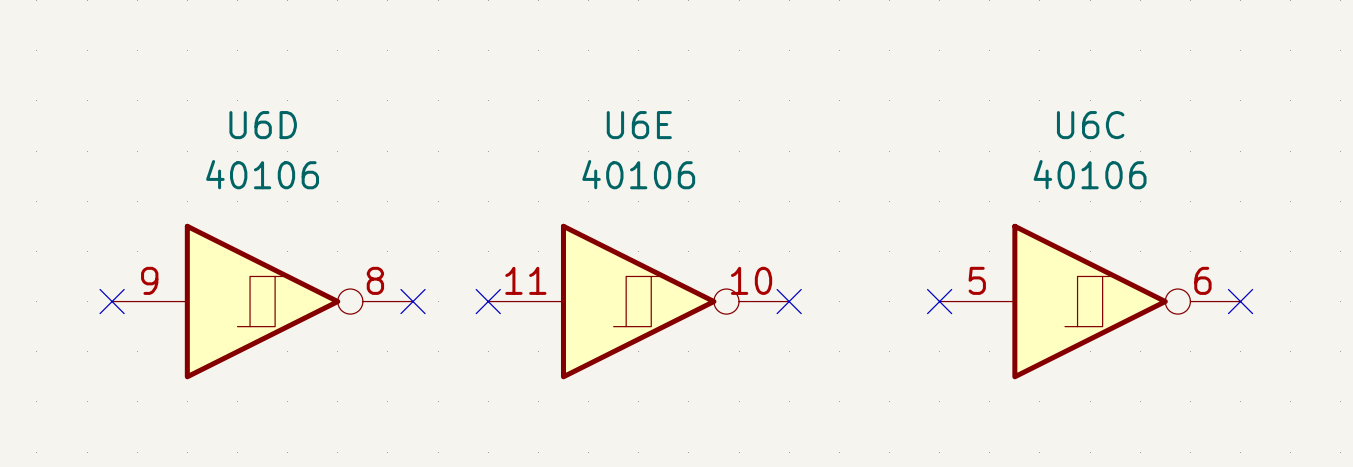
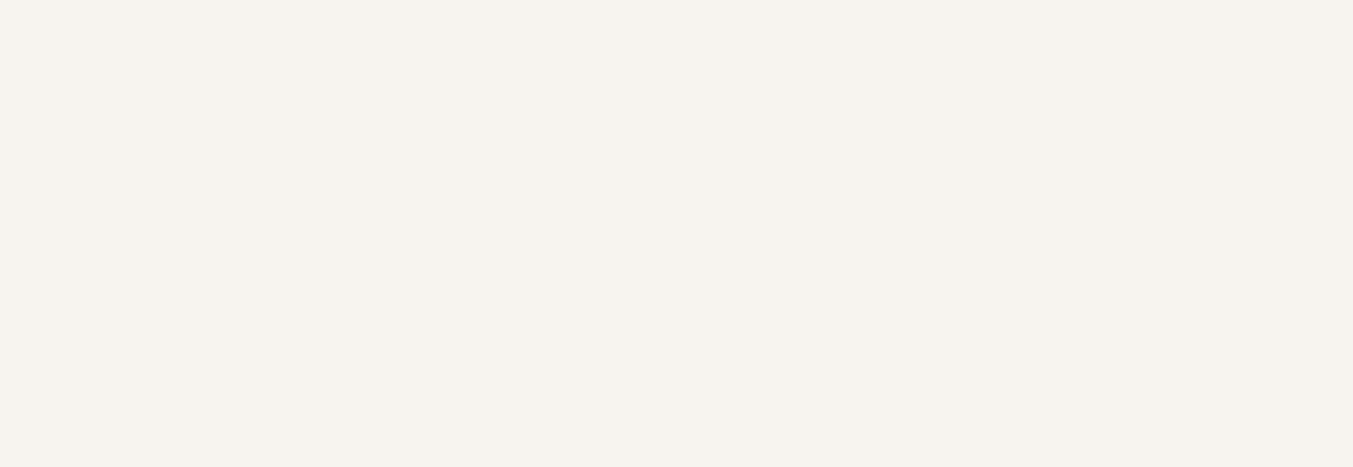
no-connect mark: (112, 301) -> none
U6D: 40106 (262, 301) -> none
no-connect mark: (413, 301) -> none
no-connect mark: (488, 301) -> none
U6E: 40106 (638, 301) -> none
no-connect mark: (789, 301) -> none
no-connect mark: (939, 301) -> none
U6C: 40106 (1090, 301) -> none
no-connect mark: (1240, 301) -> none

